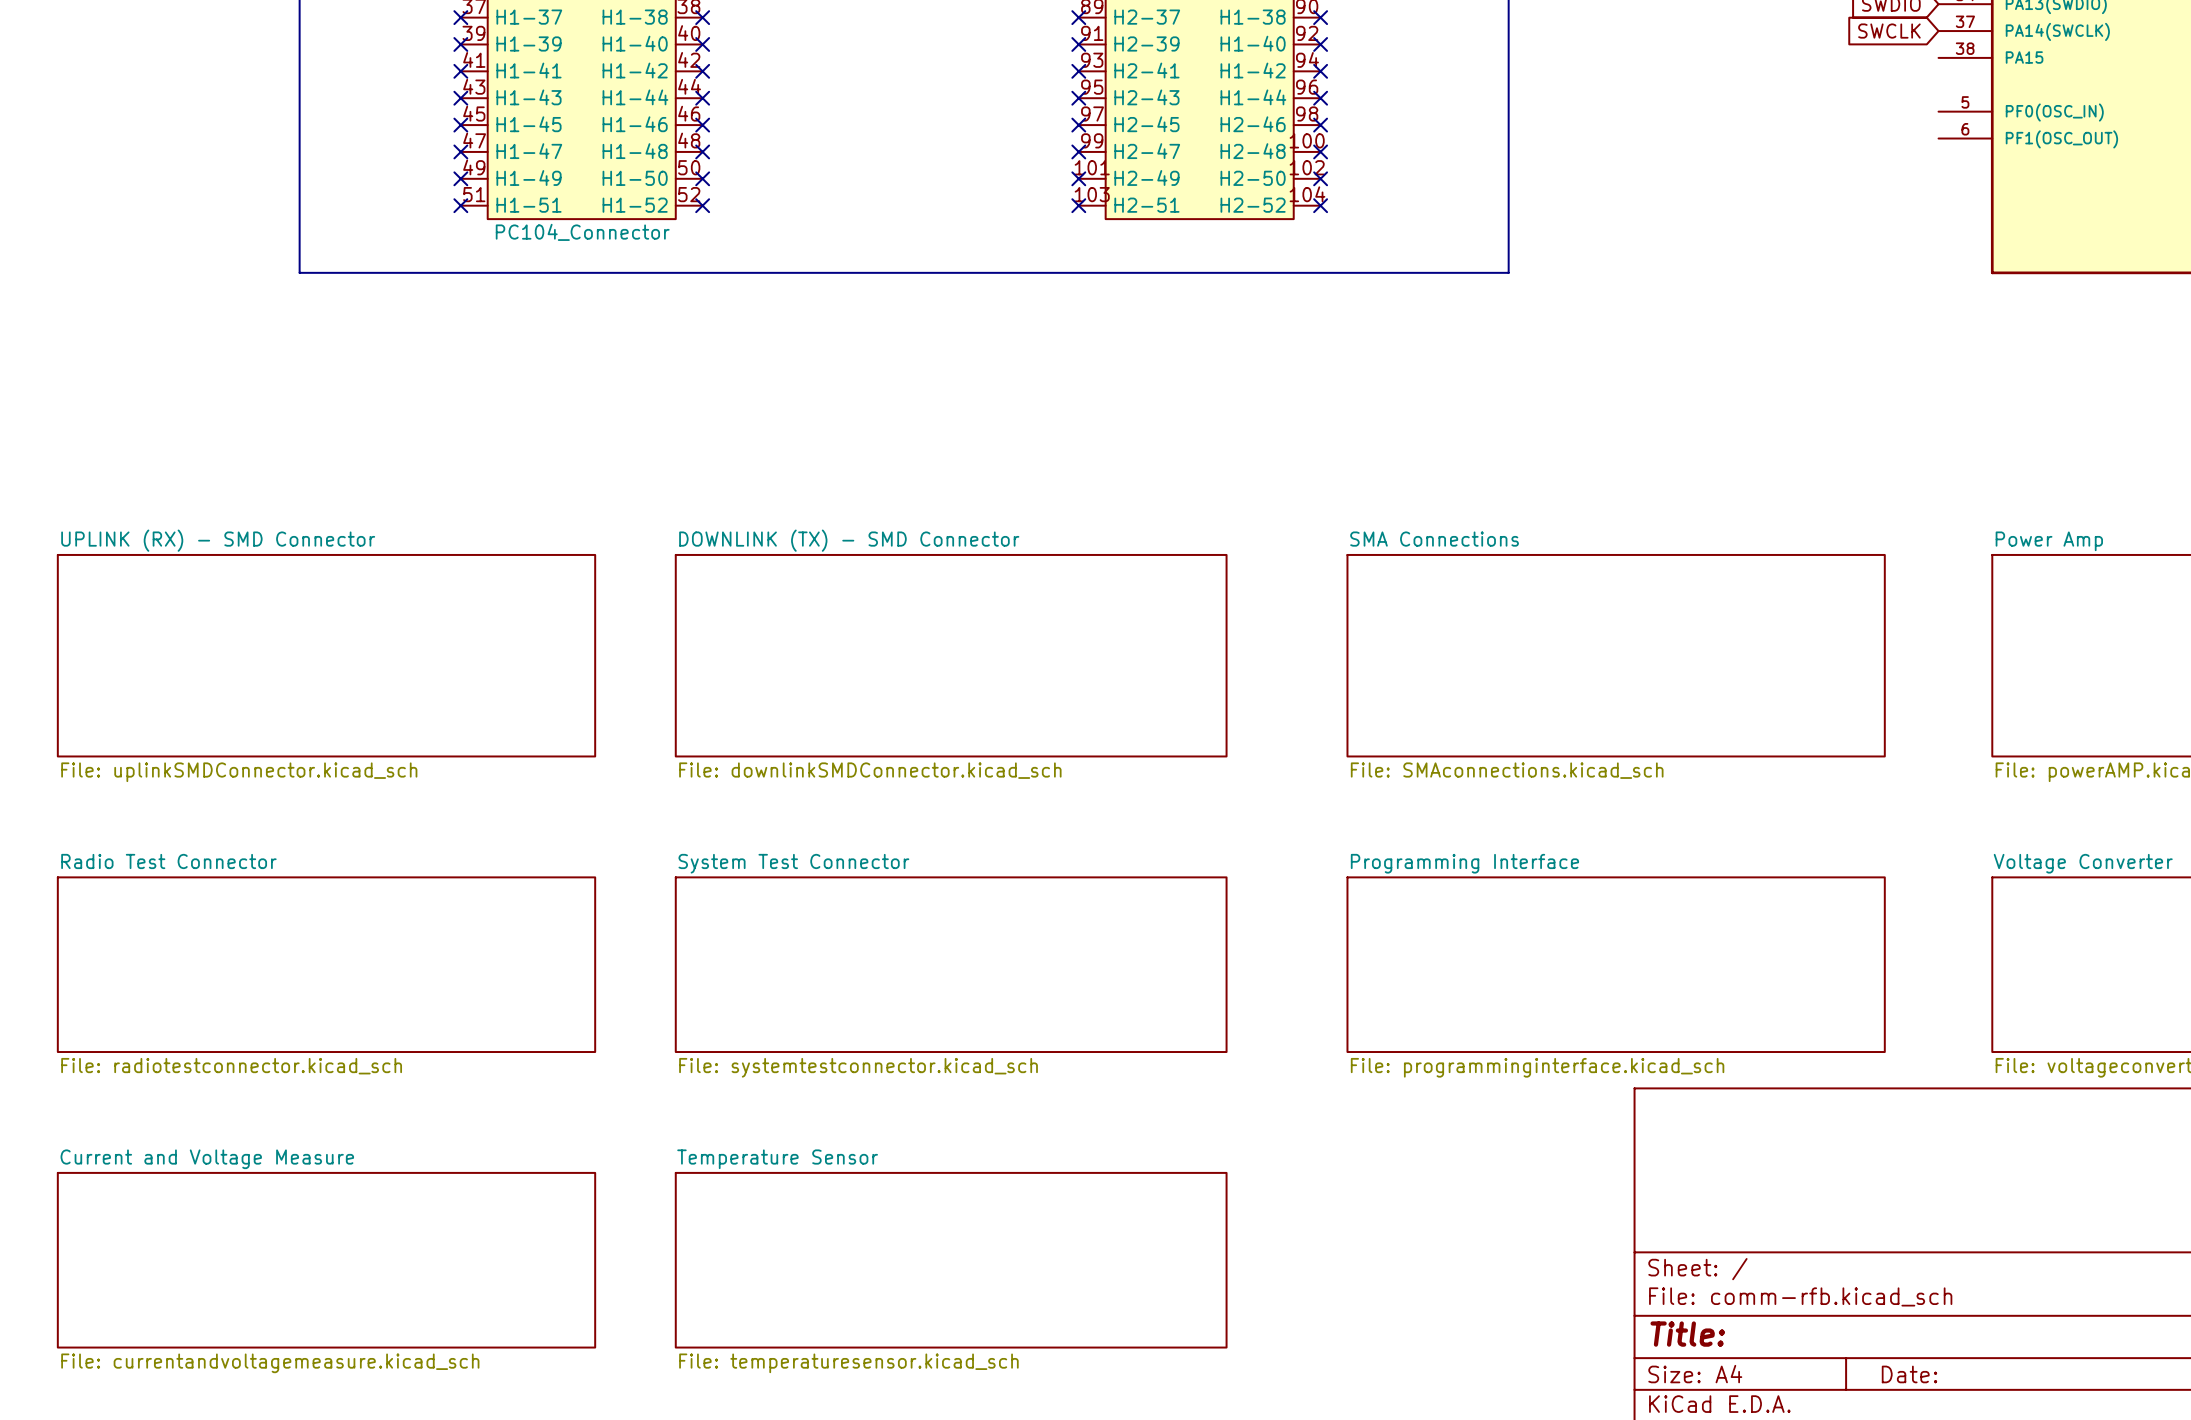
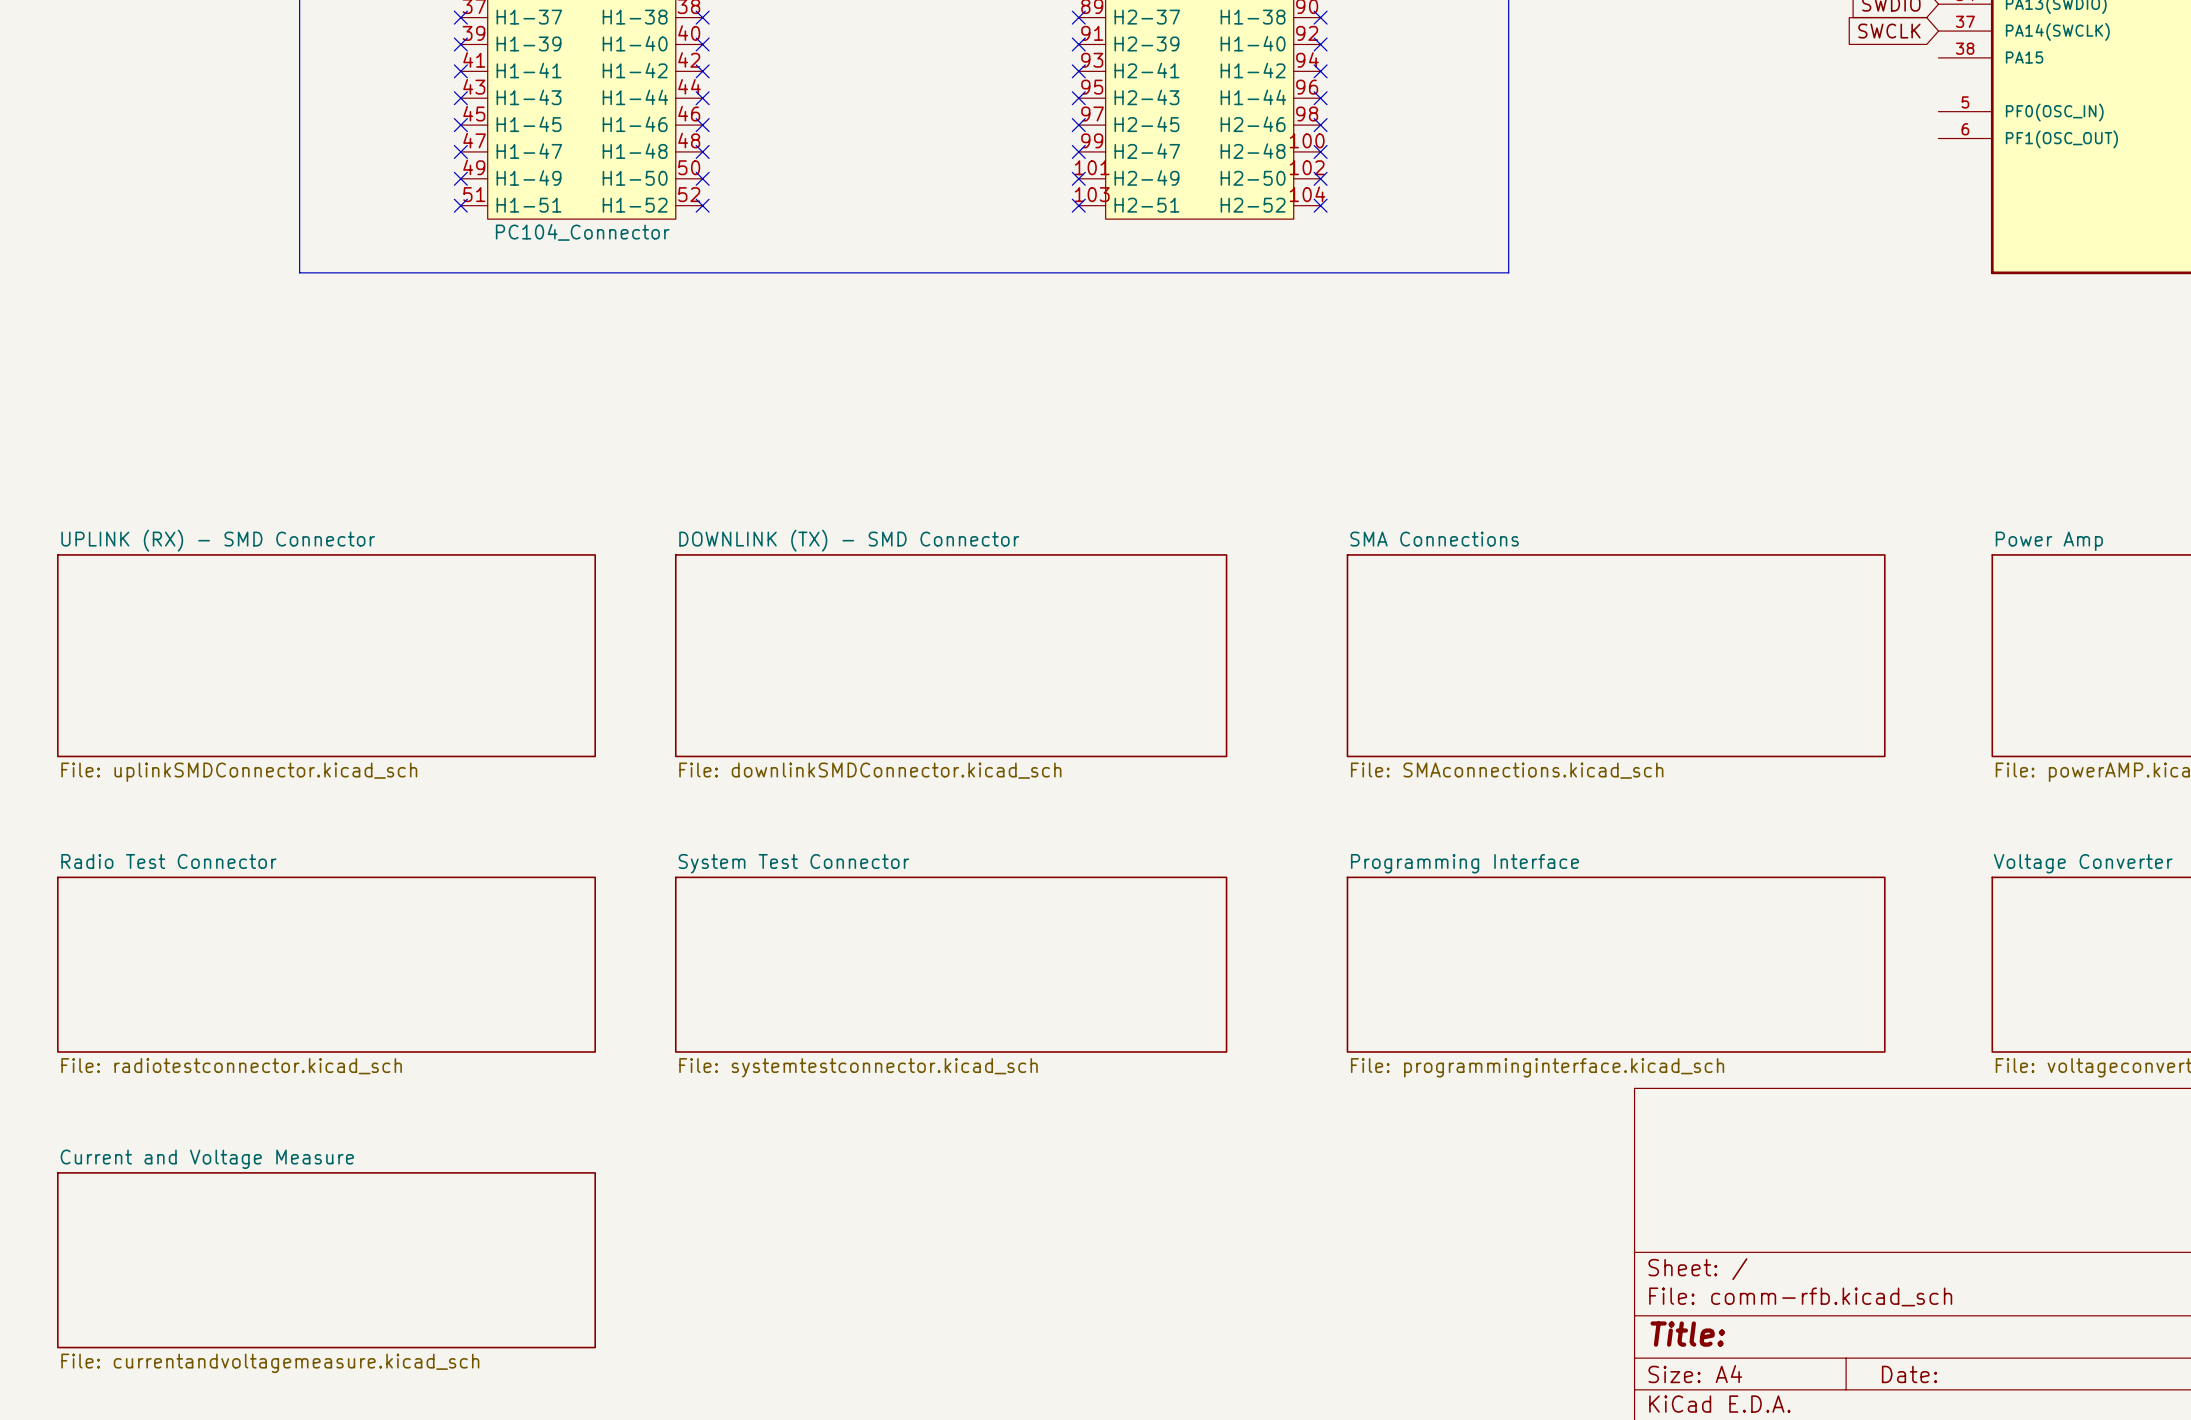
sheet Temperature Sensor: File: temperaturesensor.kicad_sch (951, 1260) -> none

